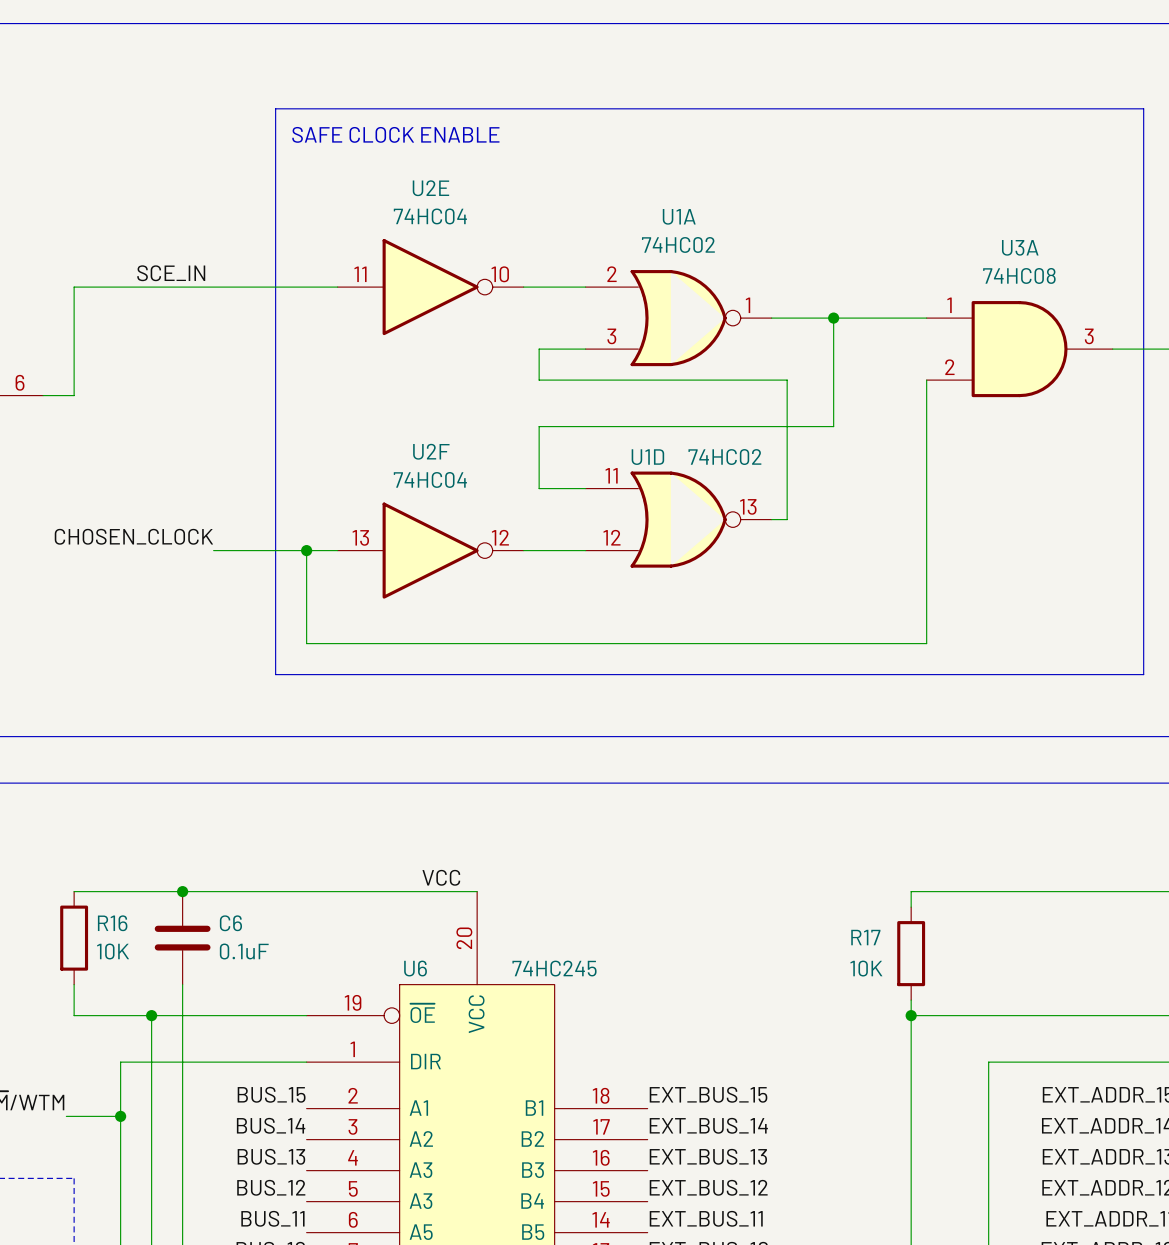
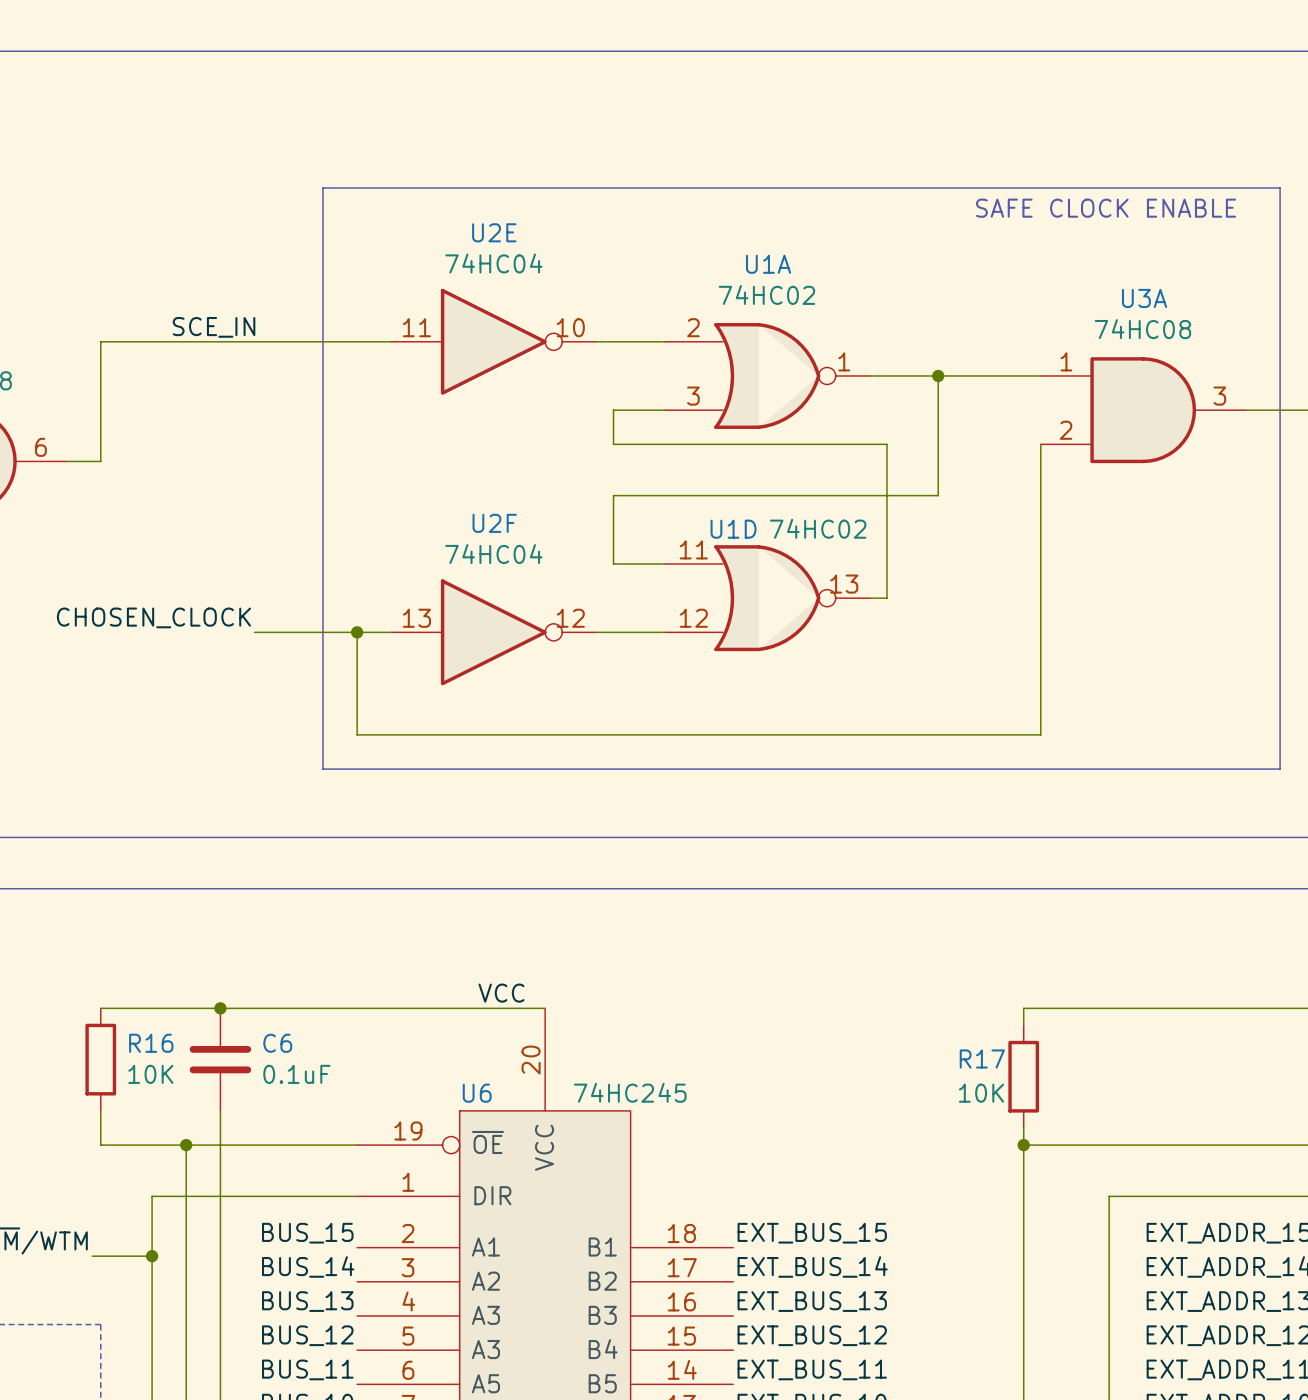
text: SAFE CLOCK ENABLE (395, 134) -> none
line: (275, 147) (275, 108) (1143, 108) (1143, 147) -> (322, 187) (1280, 187)
text: none -> SAFE CLOCK ENABLE (1106, 208)

